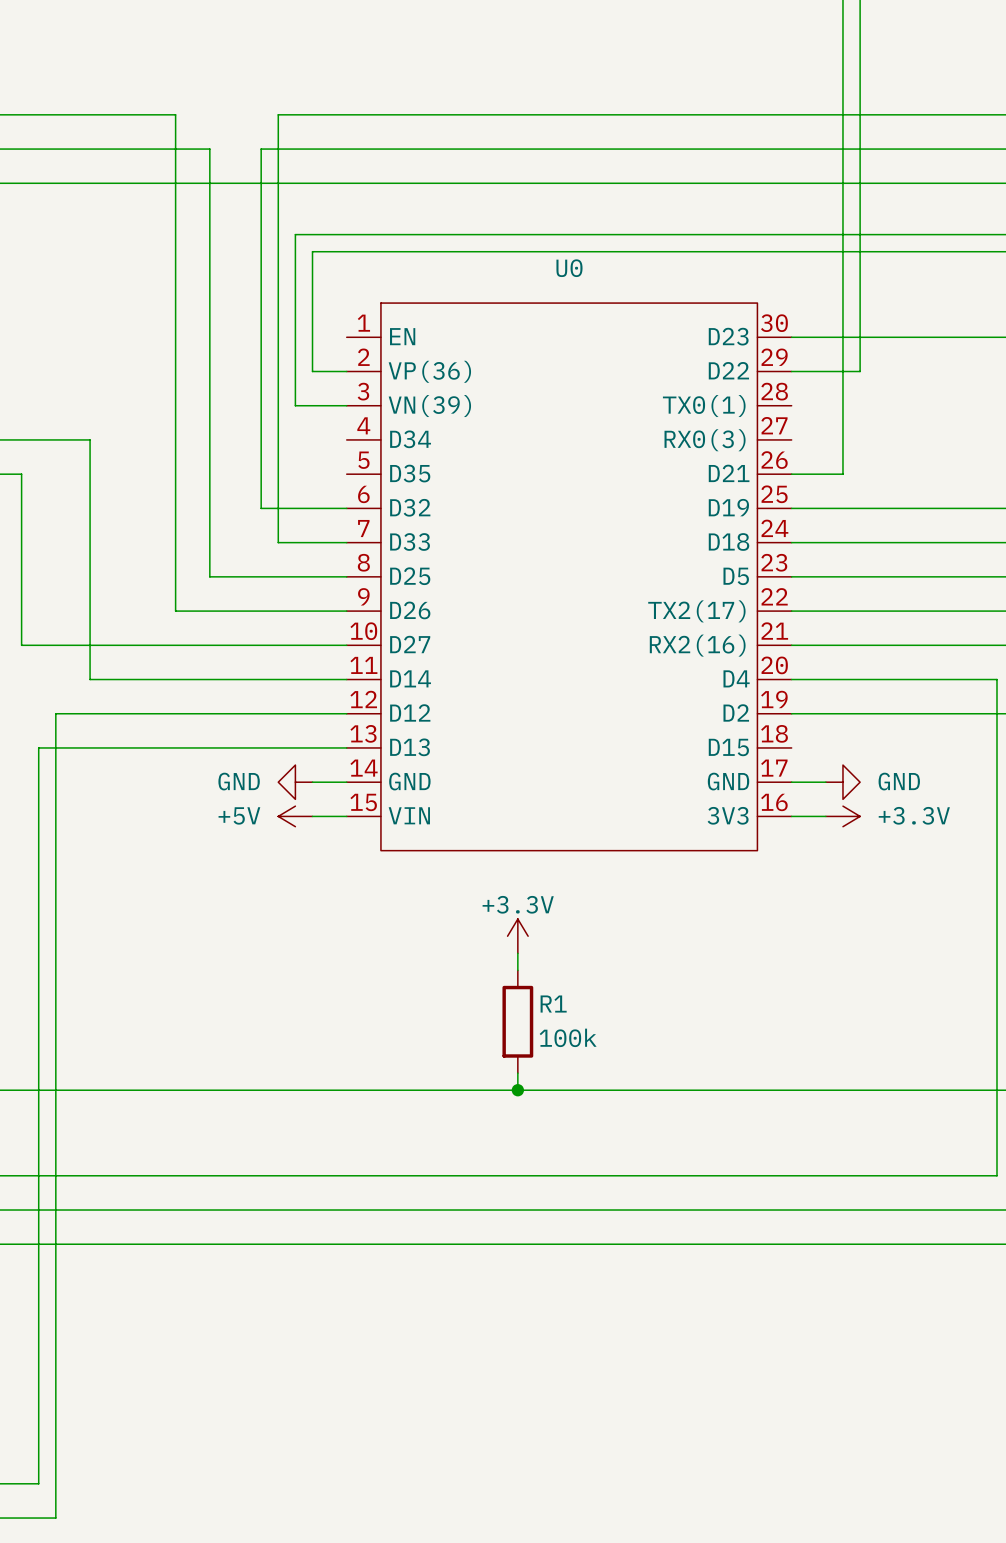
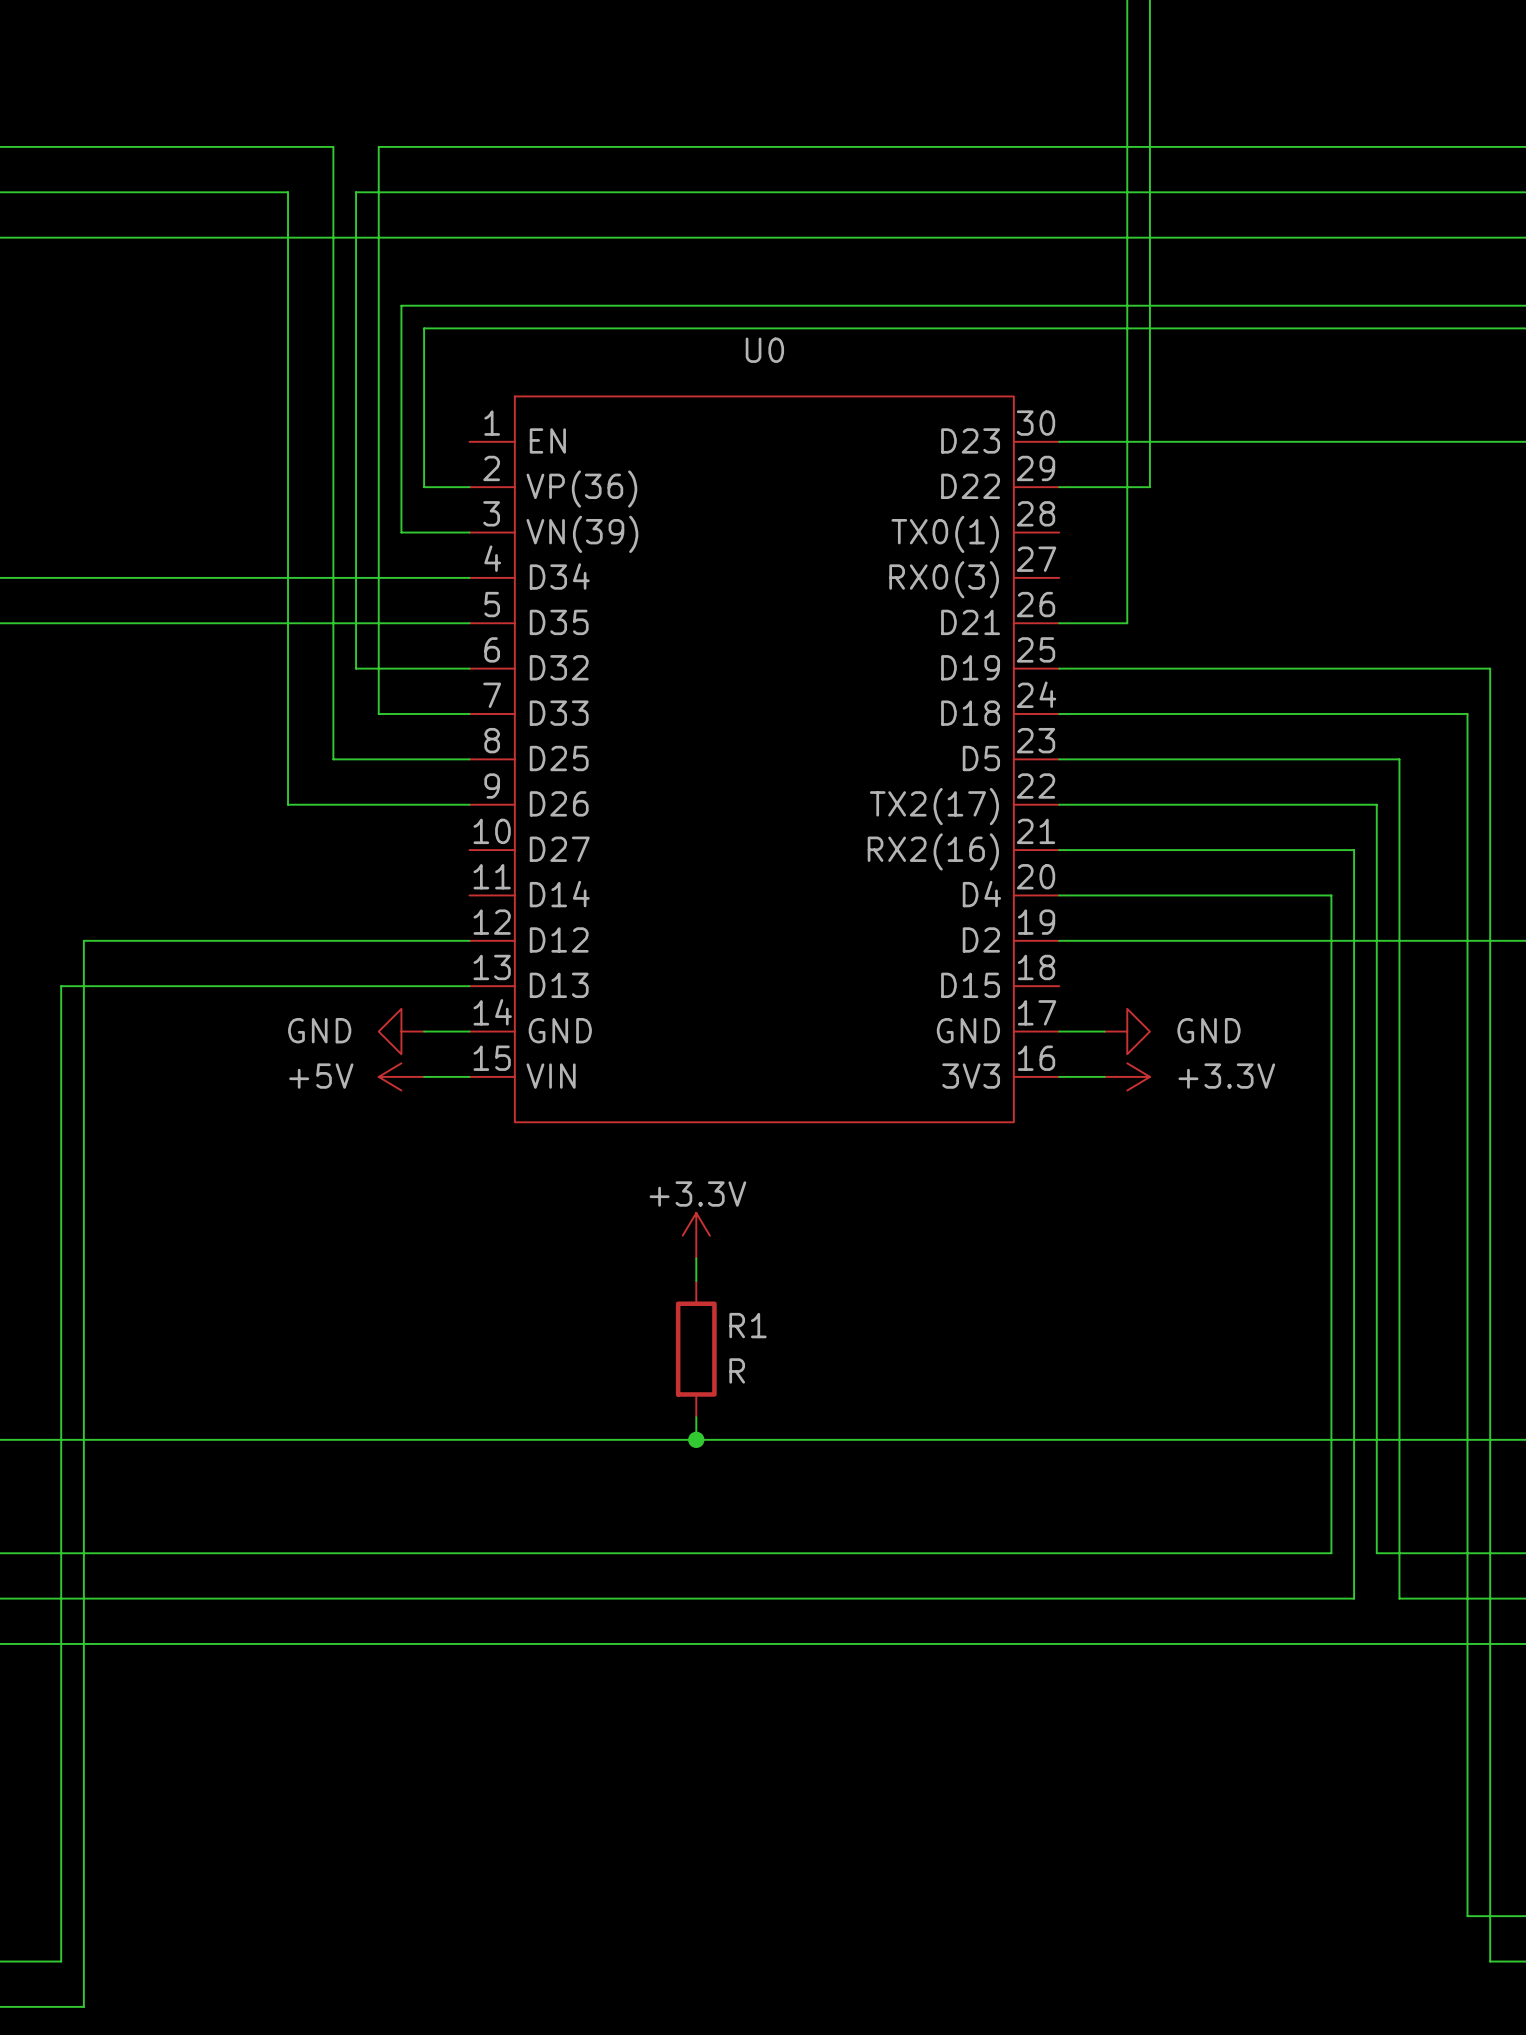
wire: (175, 114) (175, 611) (209, 611) -> (242, 146) (333, 146) (333, 759)
wire: (90, 439) (90, 679) (346, 679) -> (129, 577) (469, 577)
wire: (21, 474) (21, 645) (346, 645) -> (38, 623) (469, 623)
wire: (209, 576) (244, 576) -> (288, 759) (288, 804)
R1 value: 100k (568, 1037) -> R (737, 1370)

